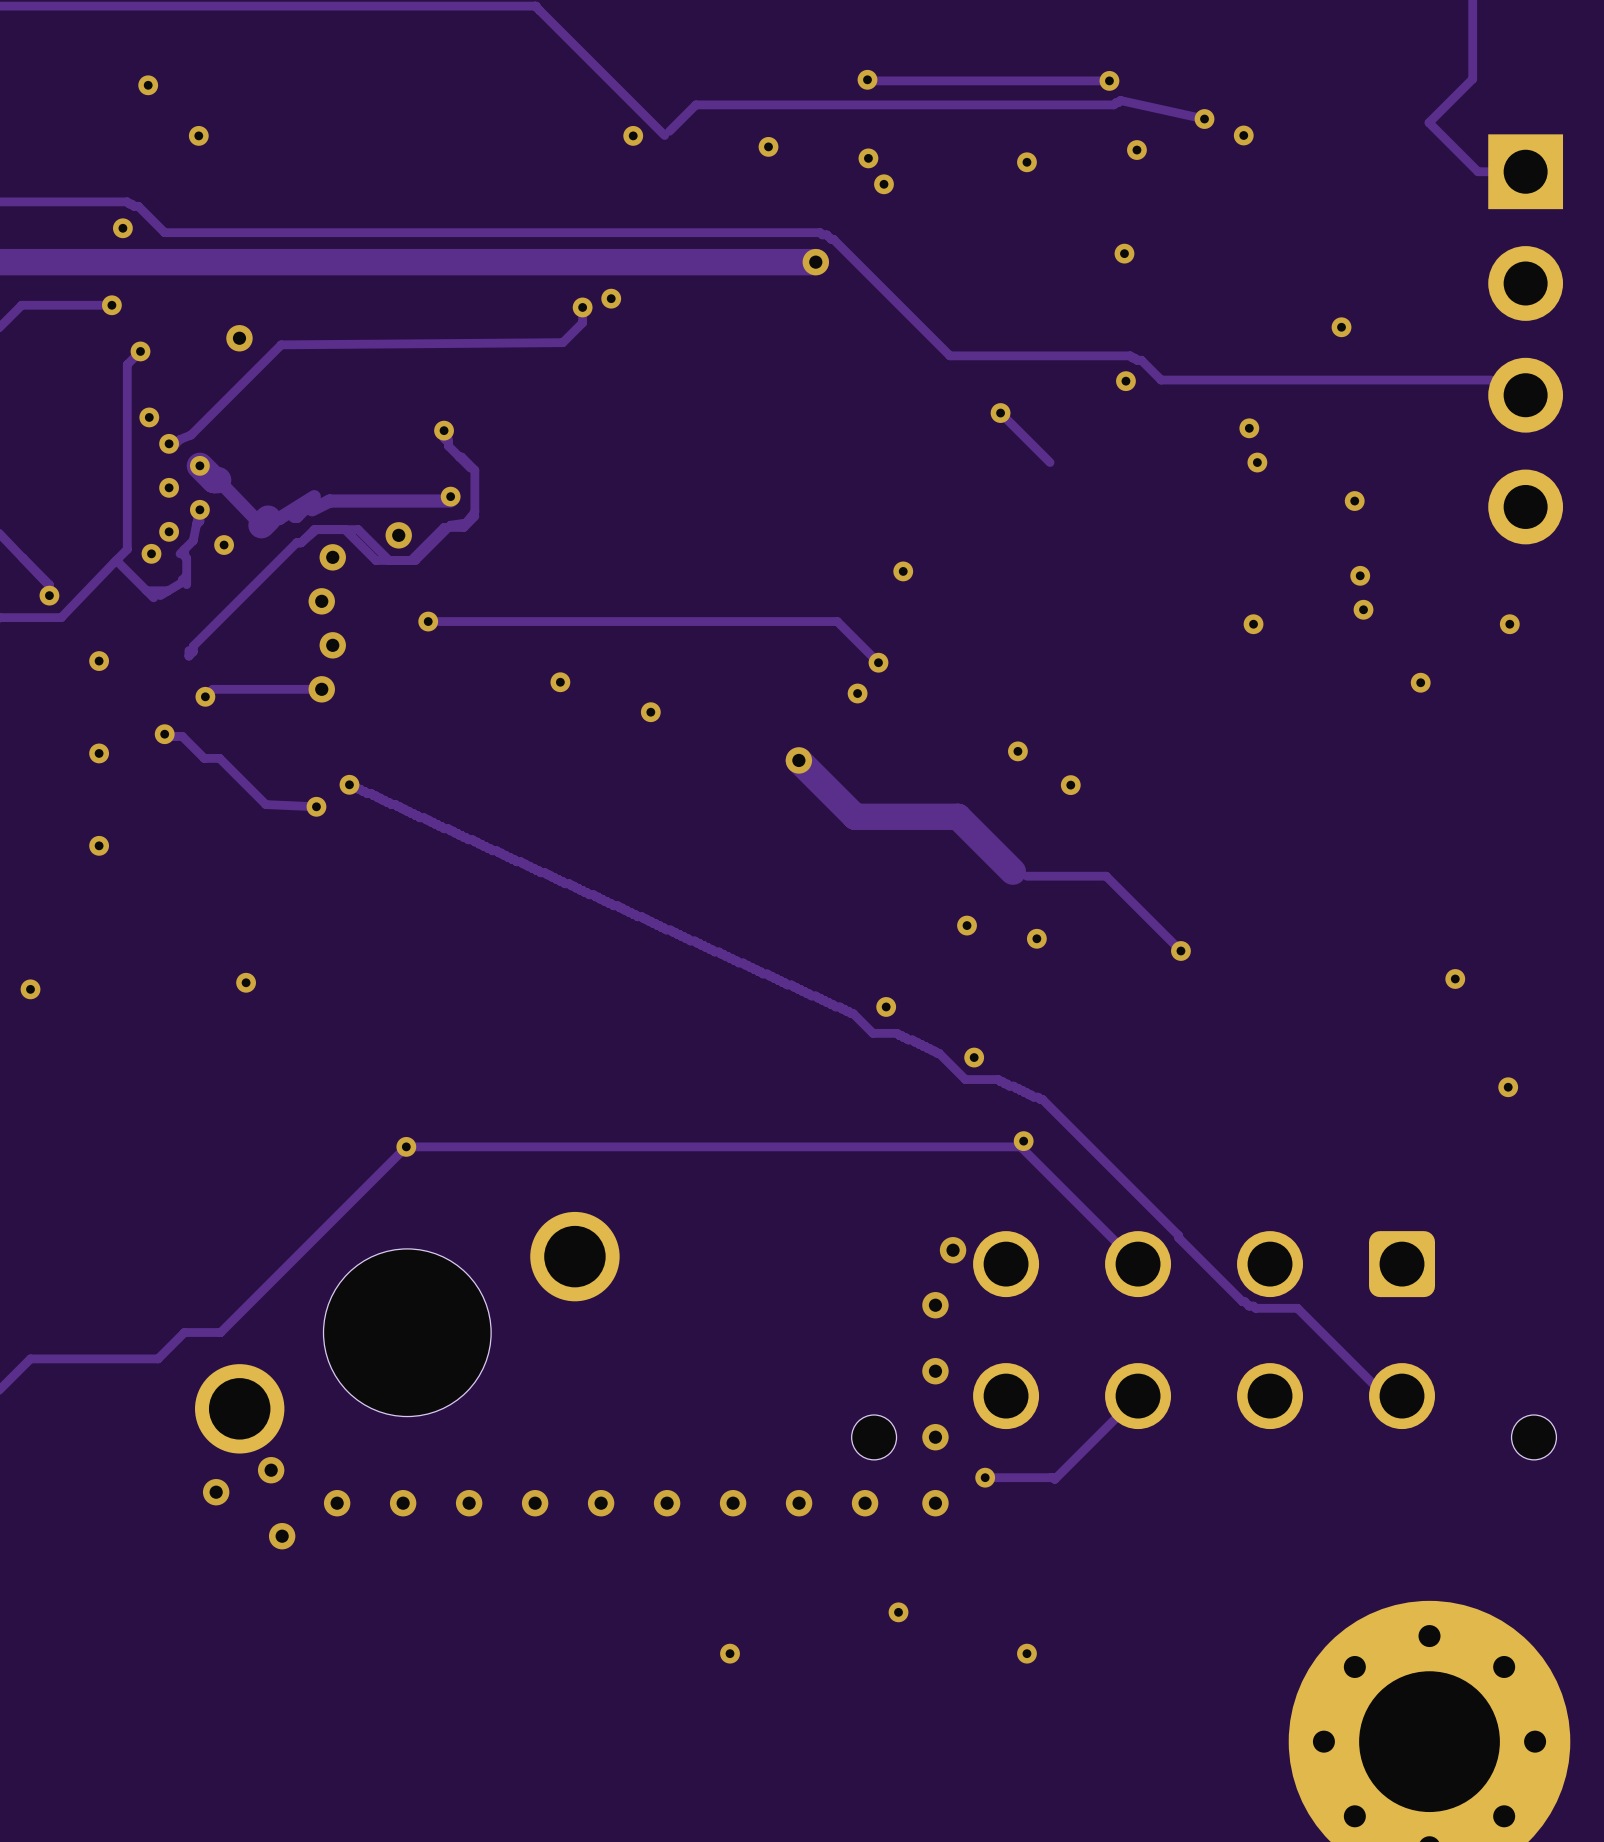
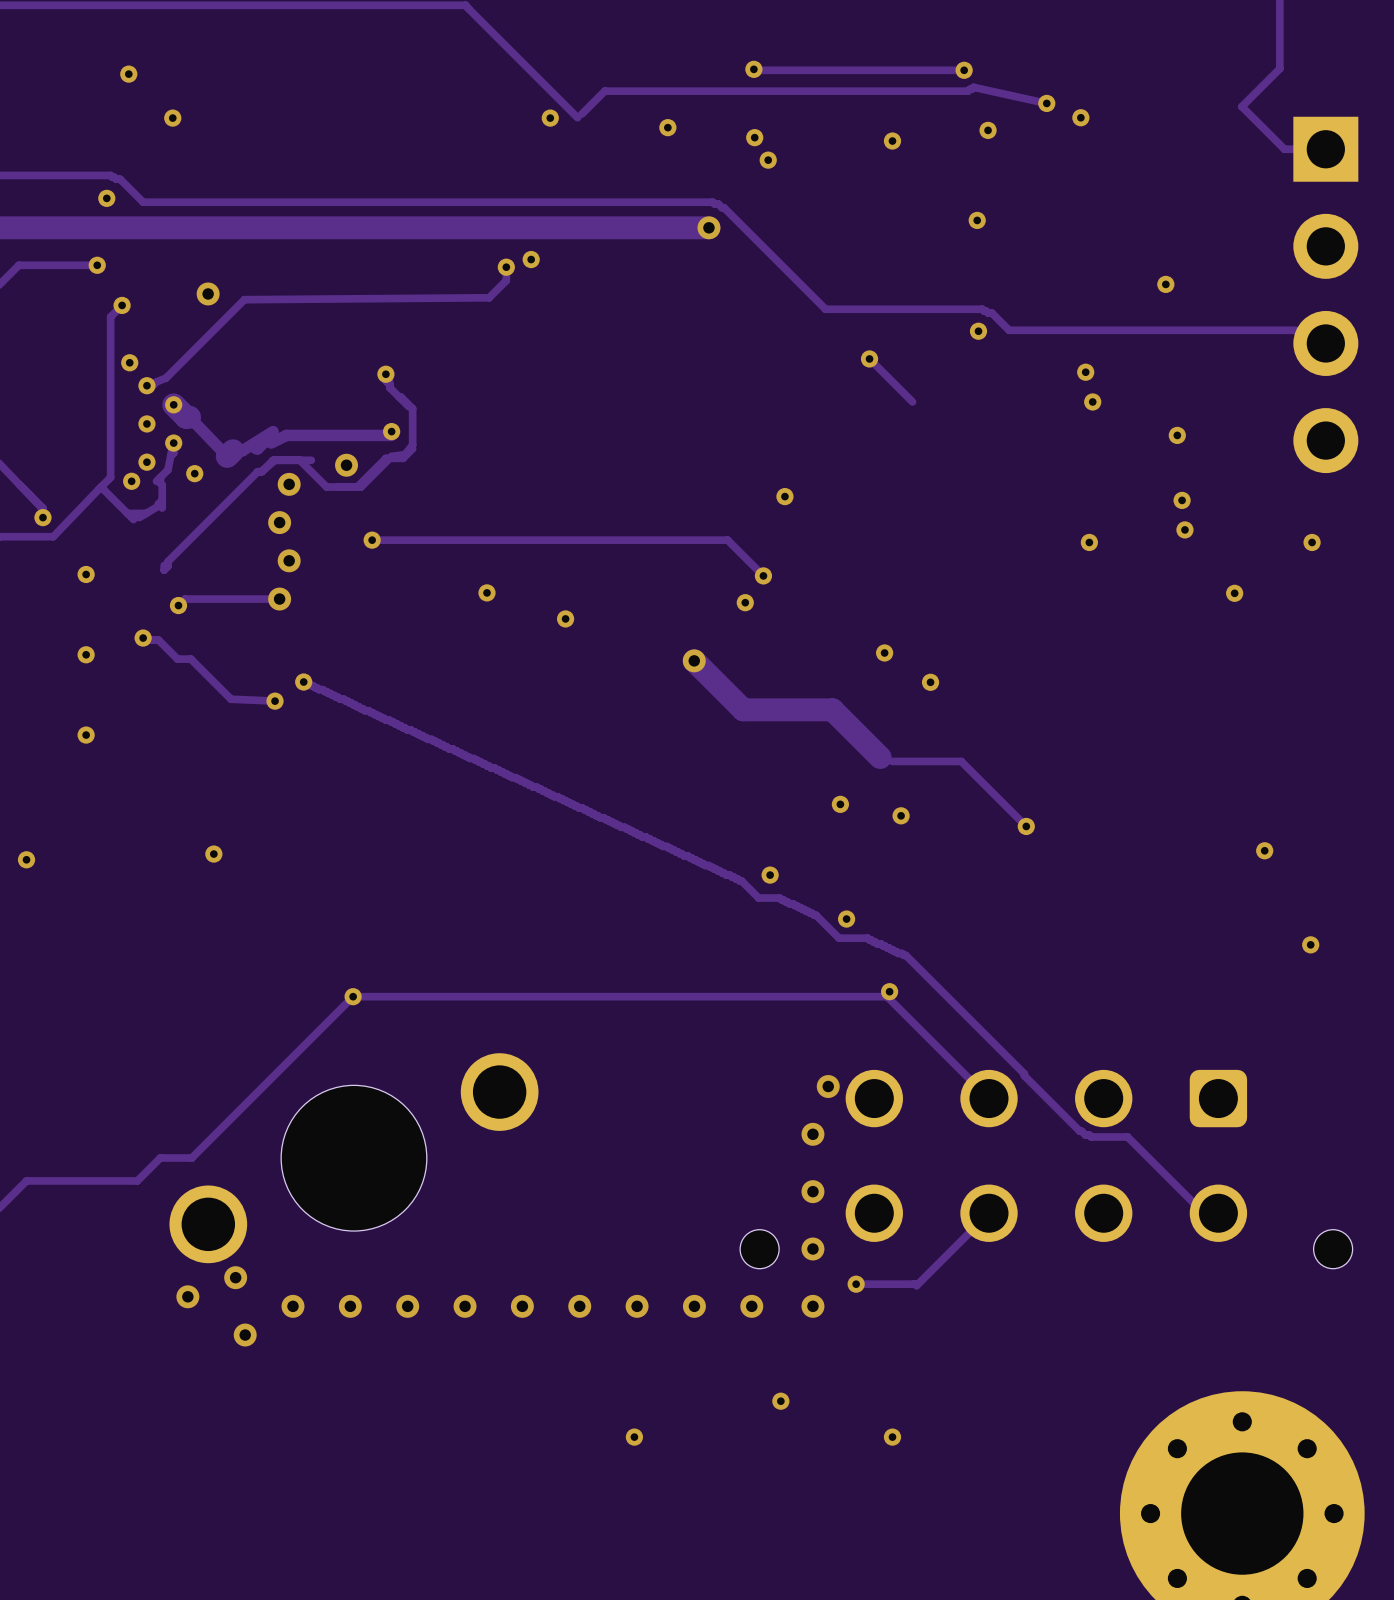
track: (358, 529) (389, 560) -> none

